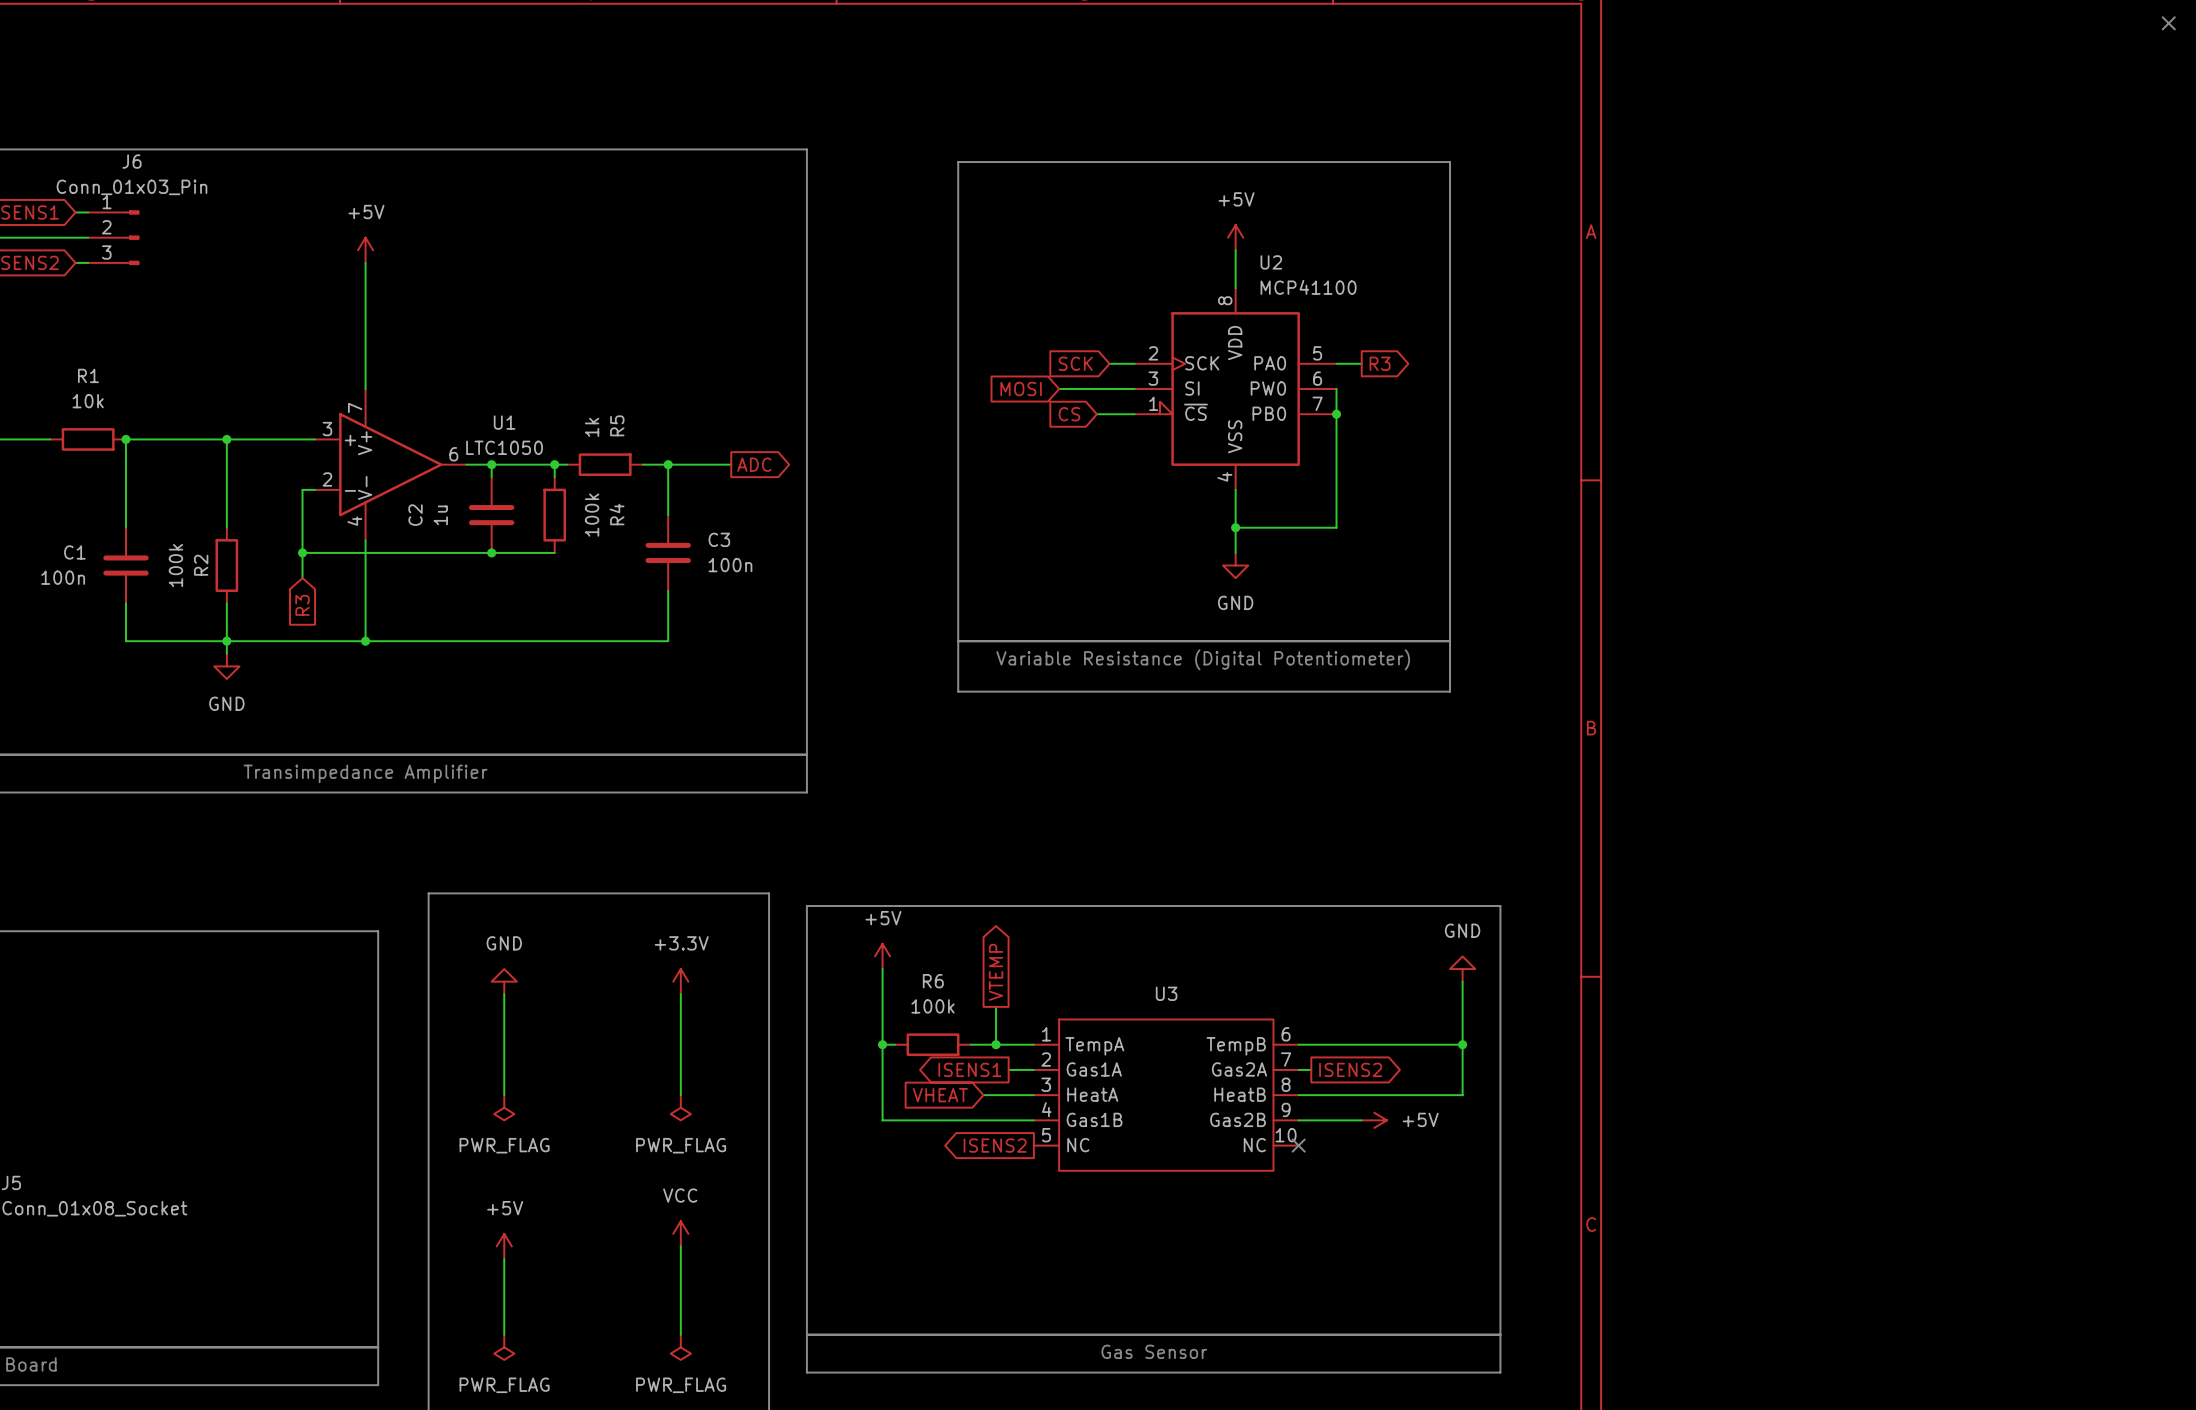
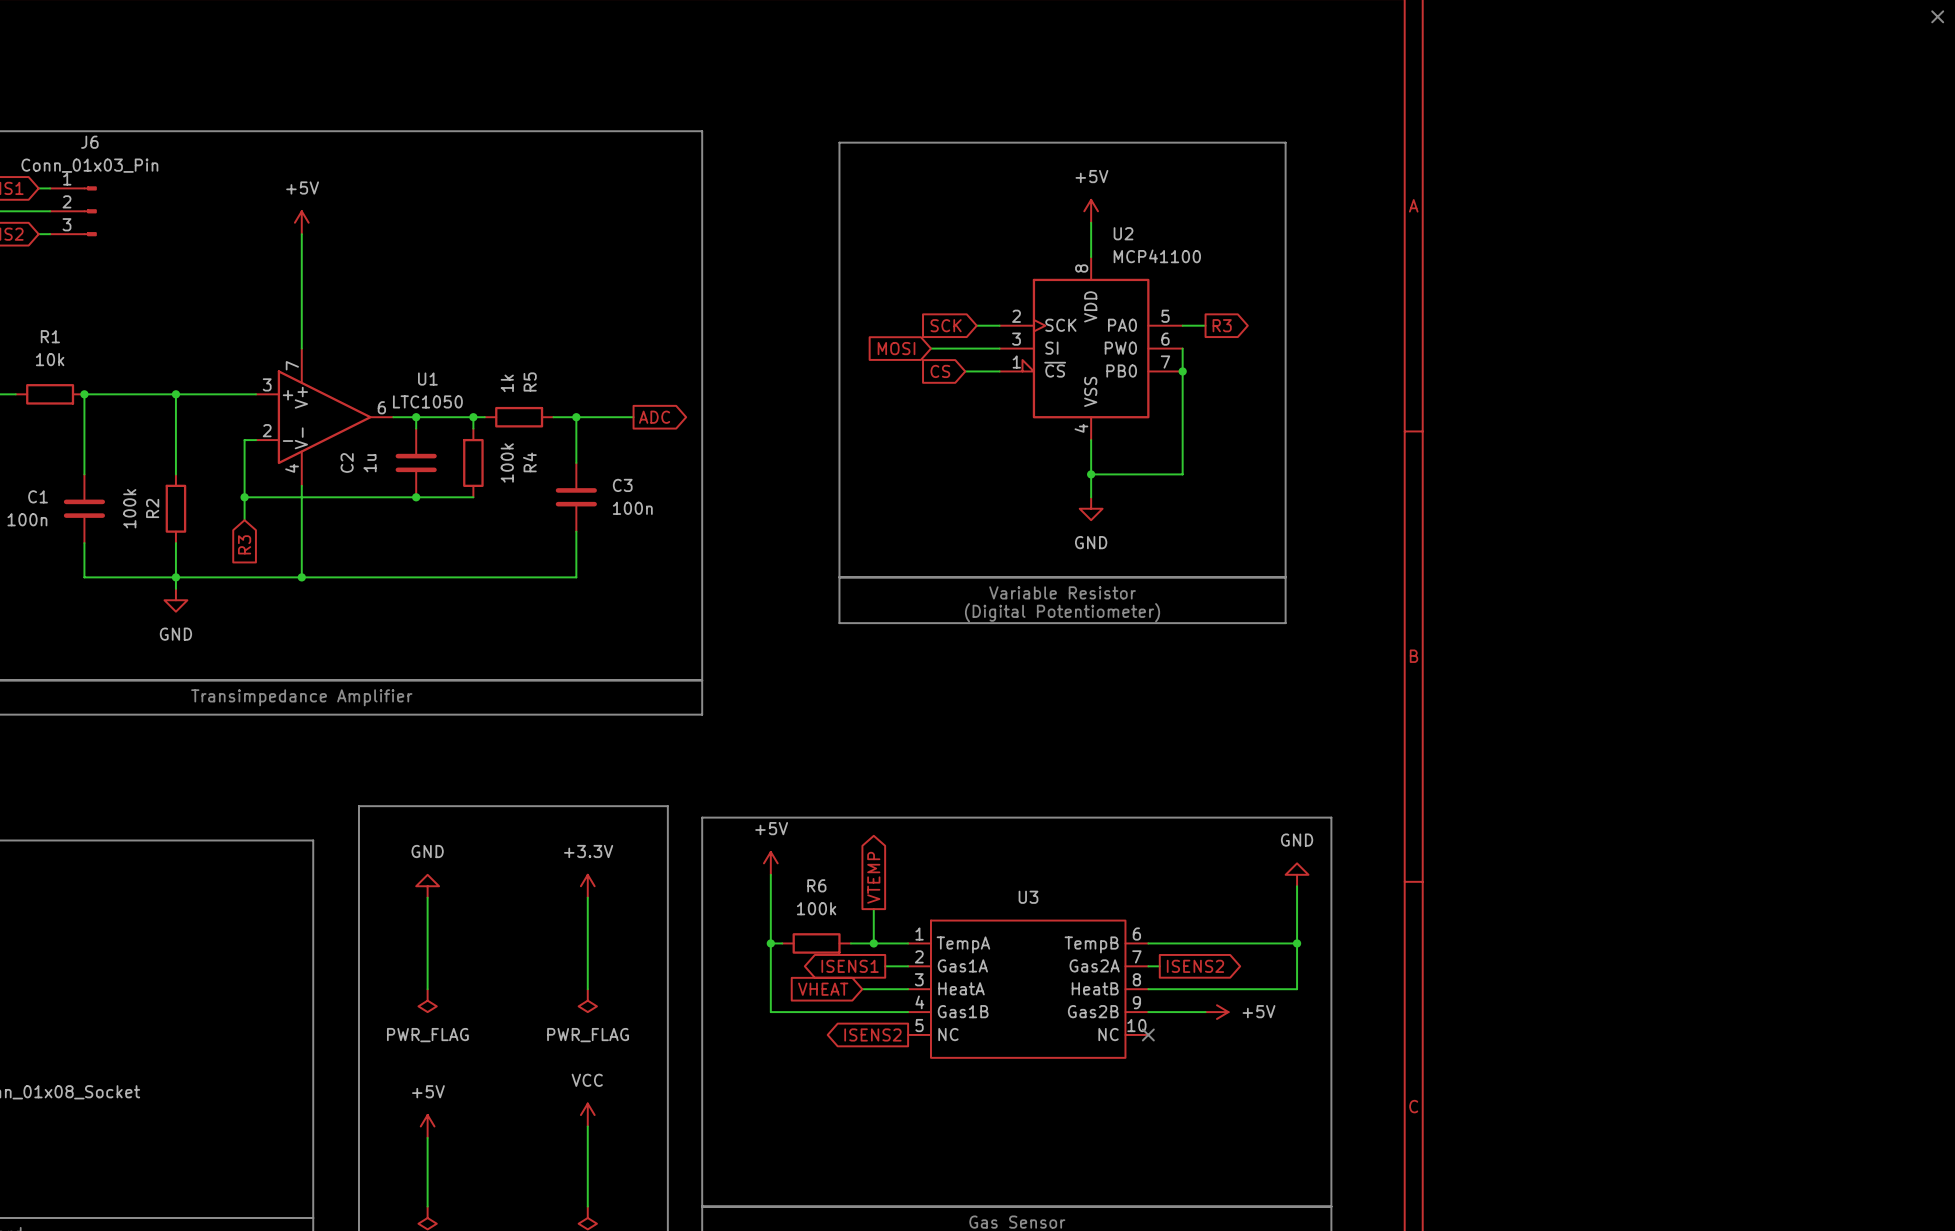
text: Variable Resistance (Digital Potentiometer) (1203, 659) -> Variable Resistor (1062, 592)
text: none -> (Digital Potentiometer) (1062, 612)

